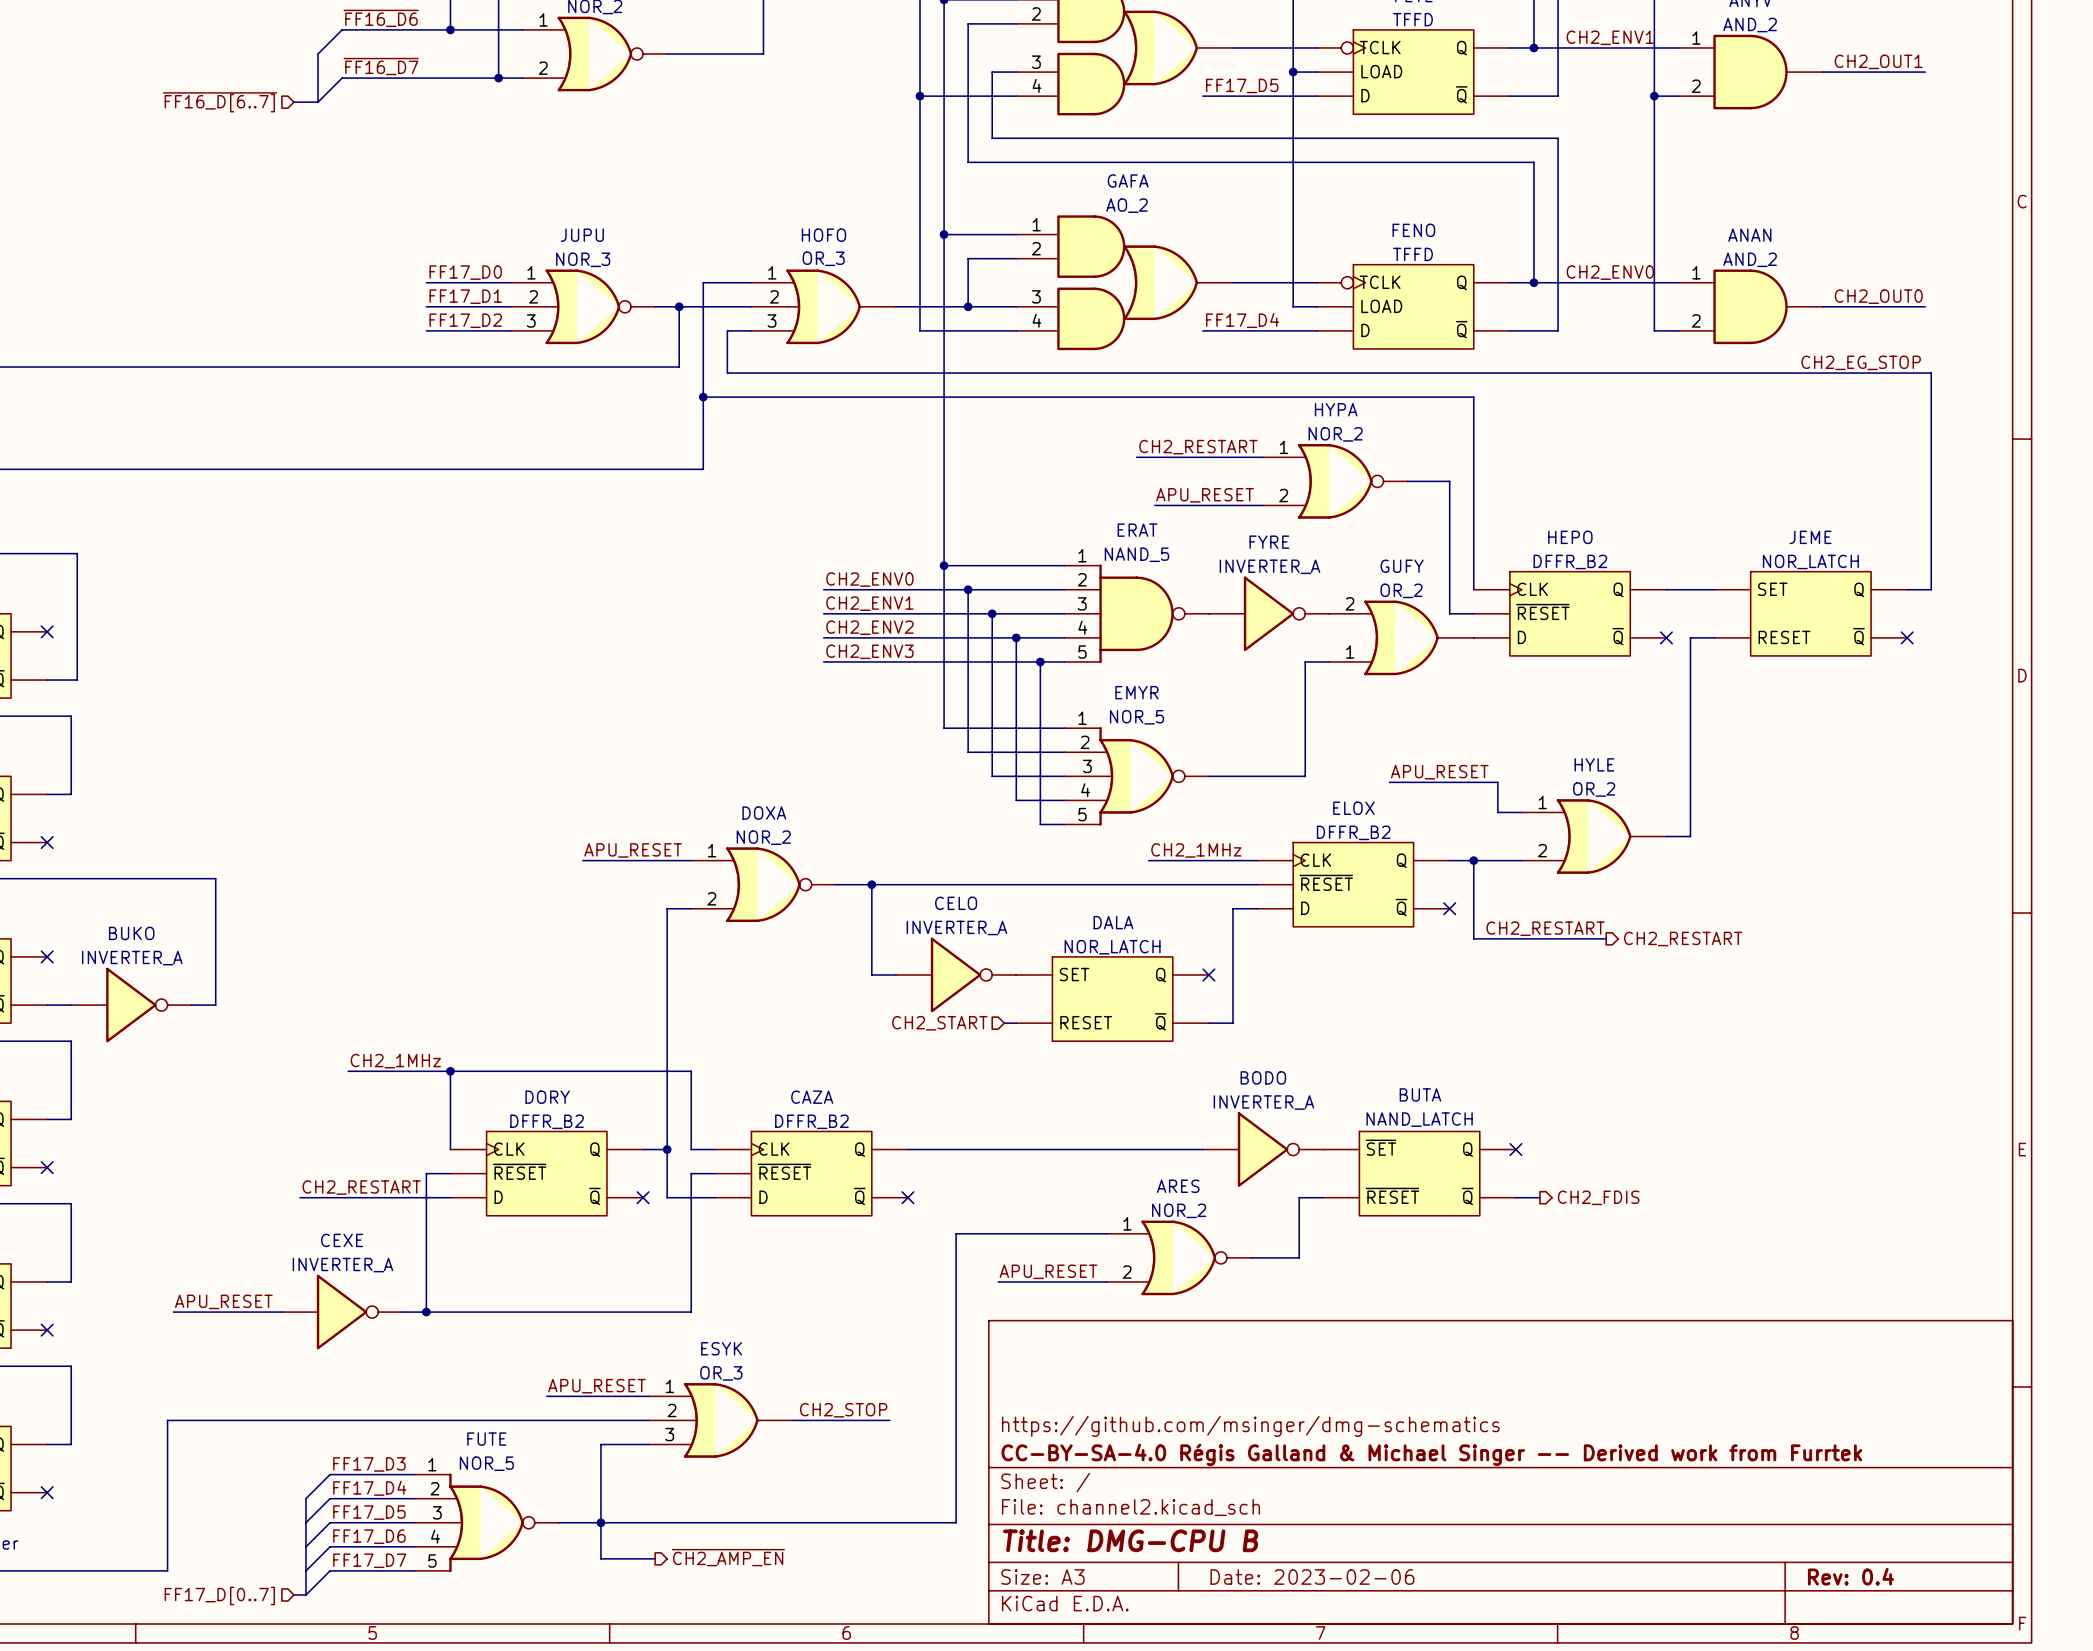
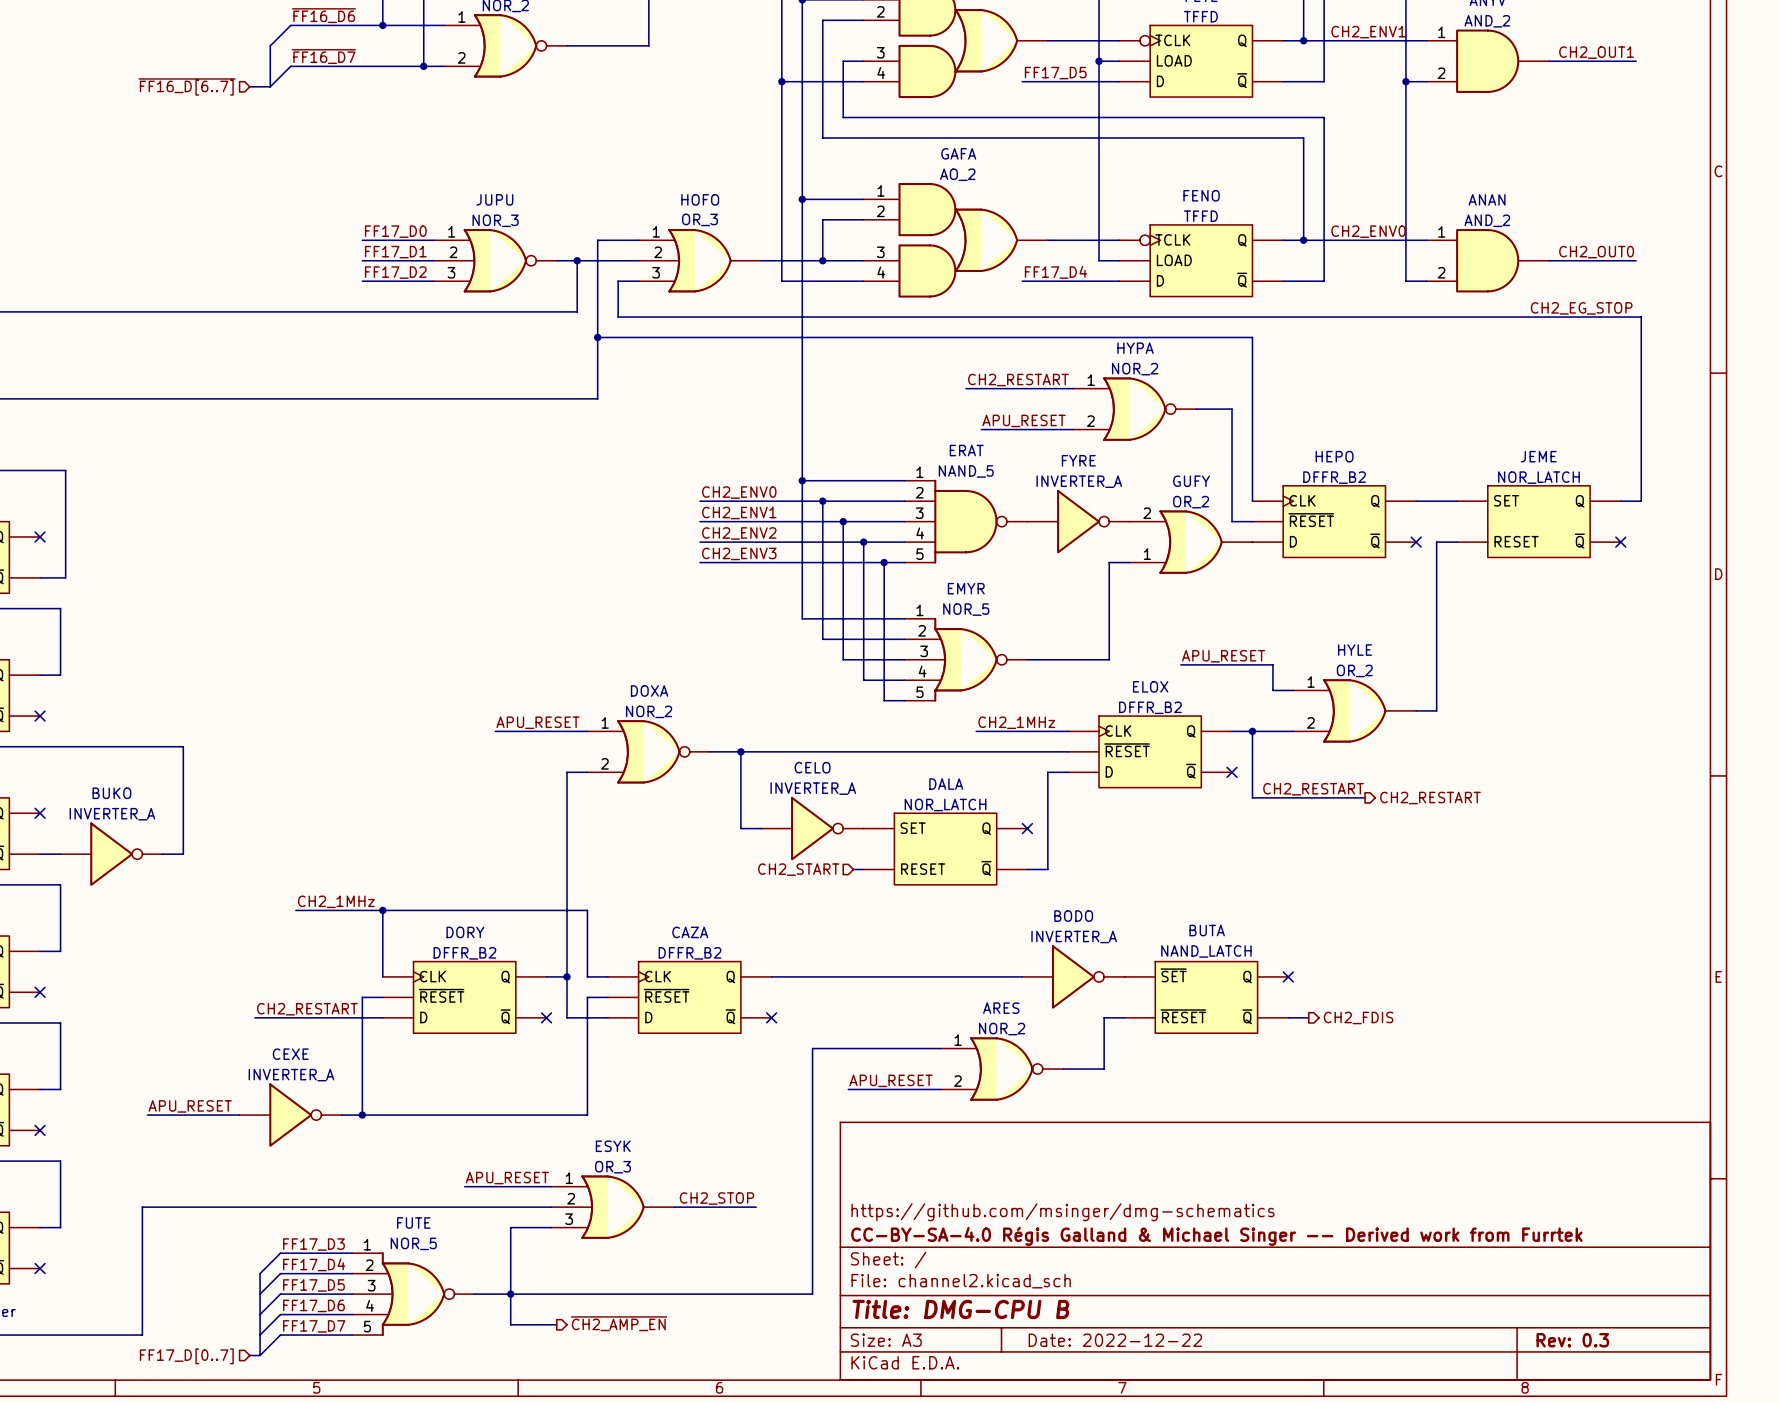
title block: Rev: 0.4 (1850, 1576) -> Rev: 0.3 (1572, 1340)
title block: Date: 2023-02-06 (1312, 1577) -> Date: 2022-12-22 (1115, 1340)

